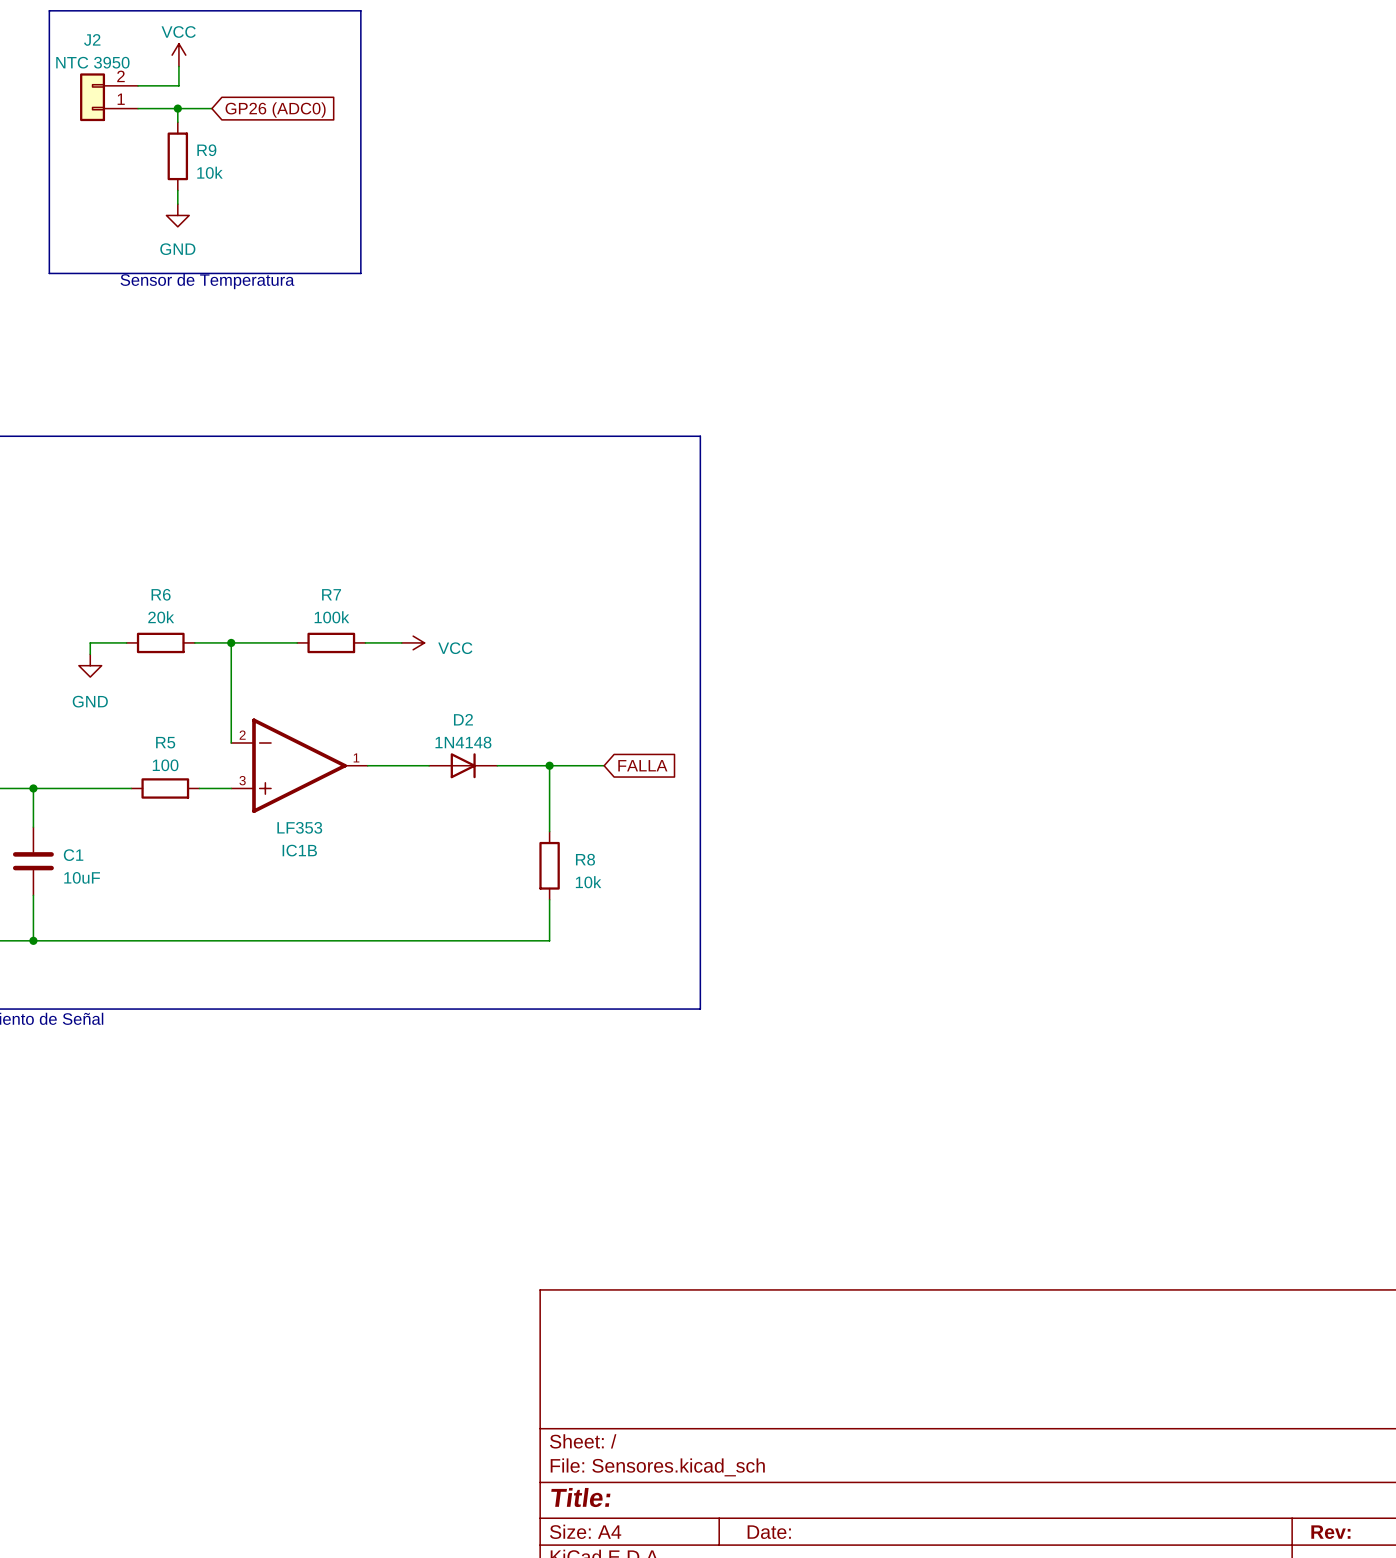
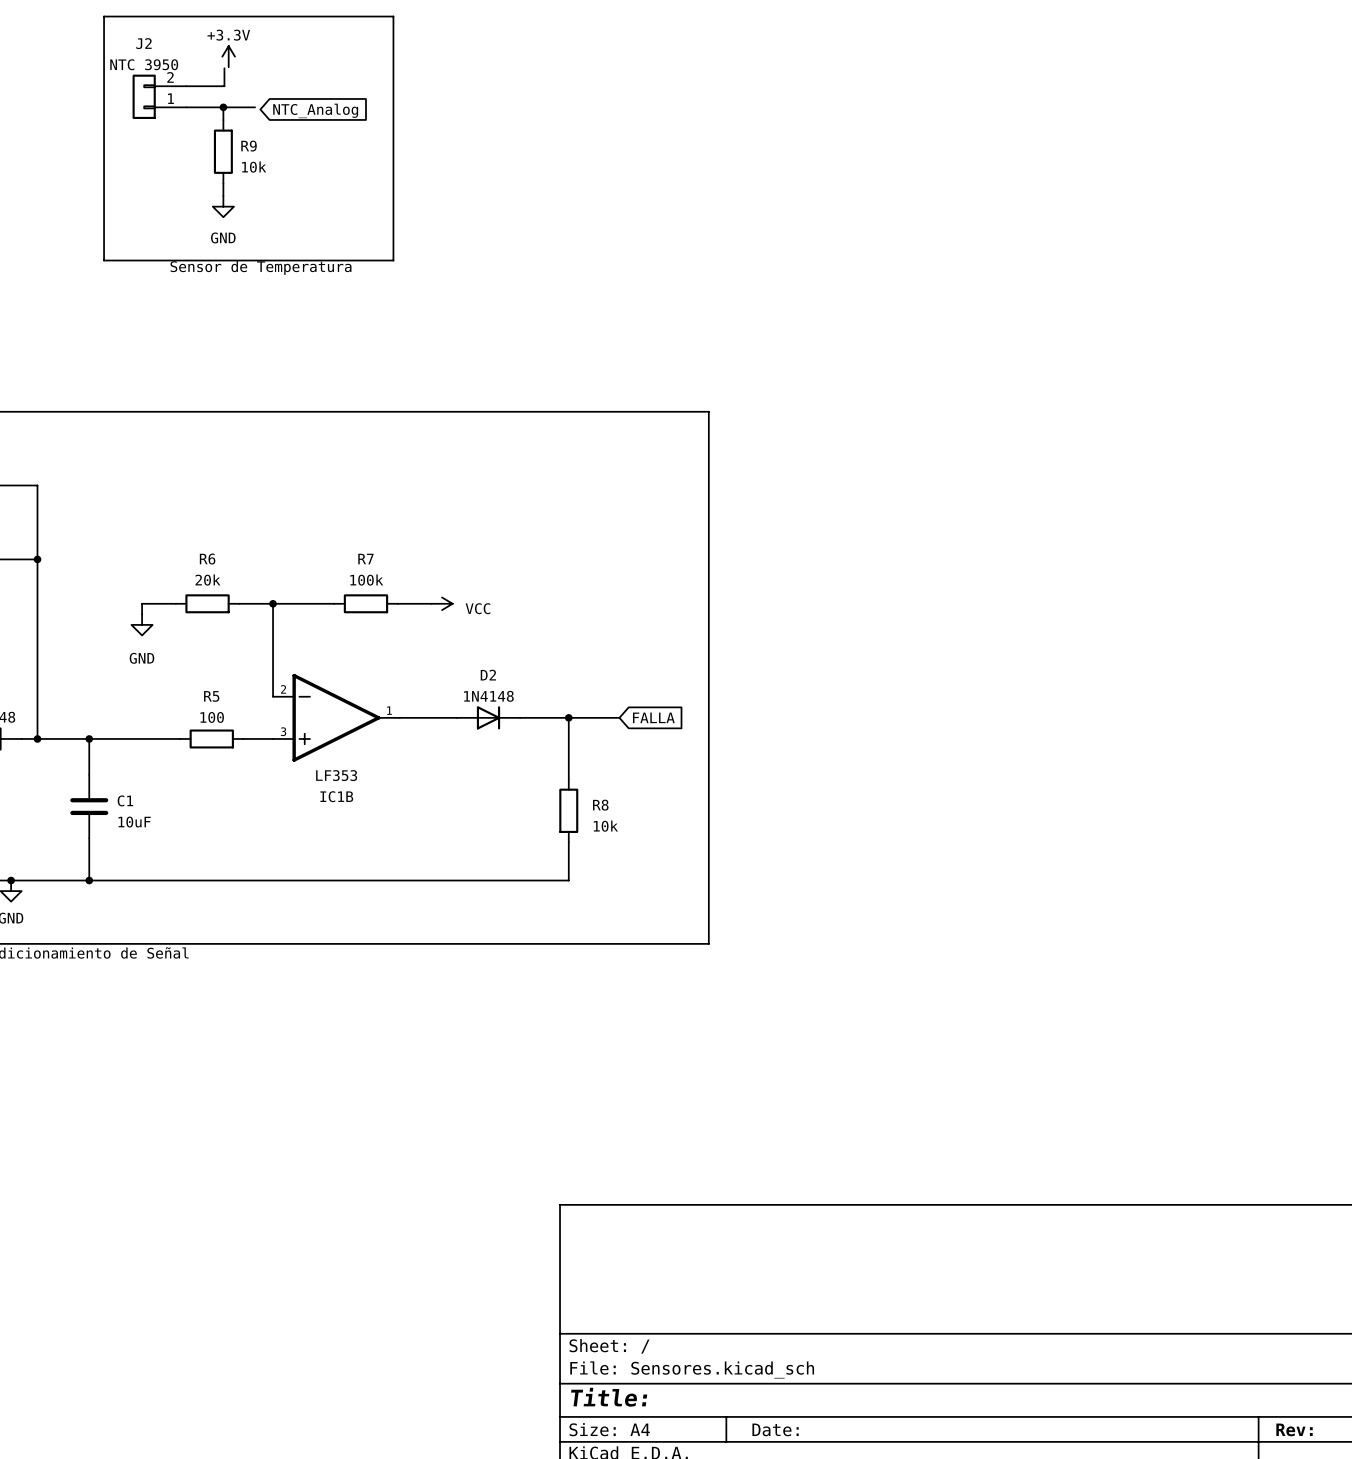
power symbol: VCC (178, 55) -> +3.3V (228, 56)
global label: GP26 (ADC0) (275, 110) -> NTC_Analog (315, 110)

